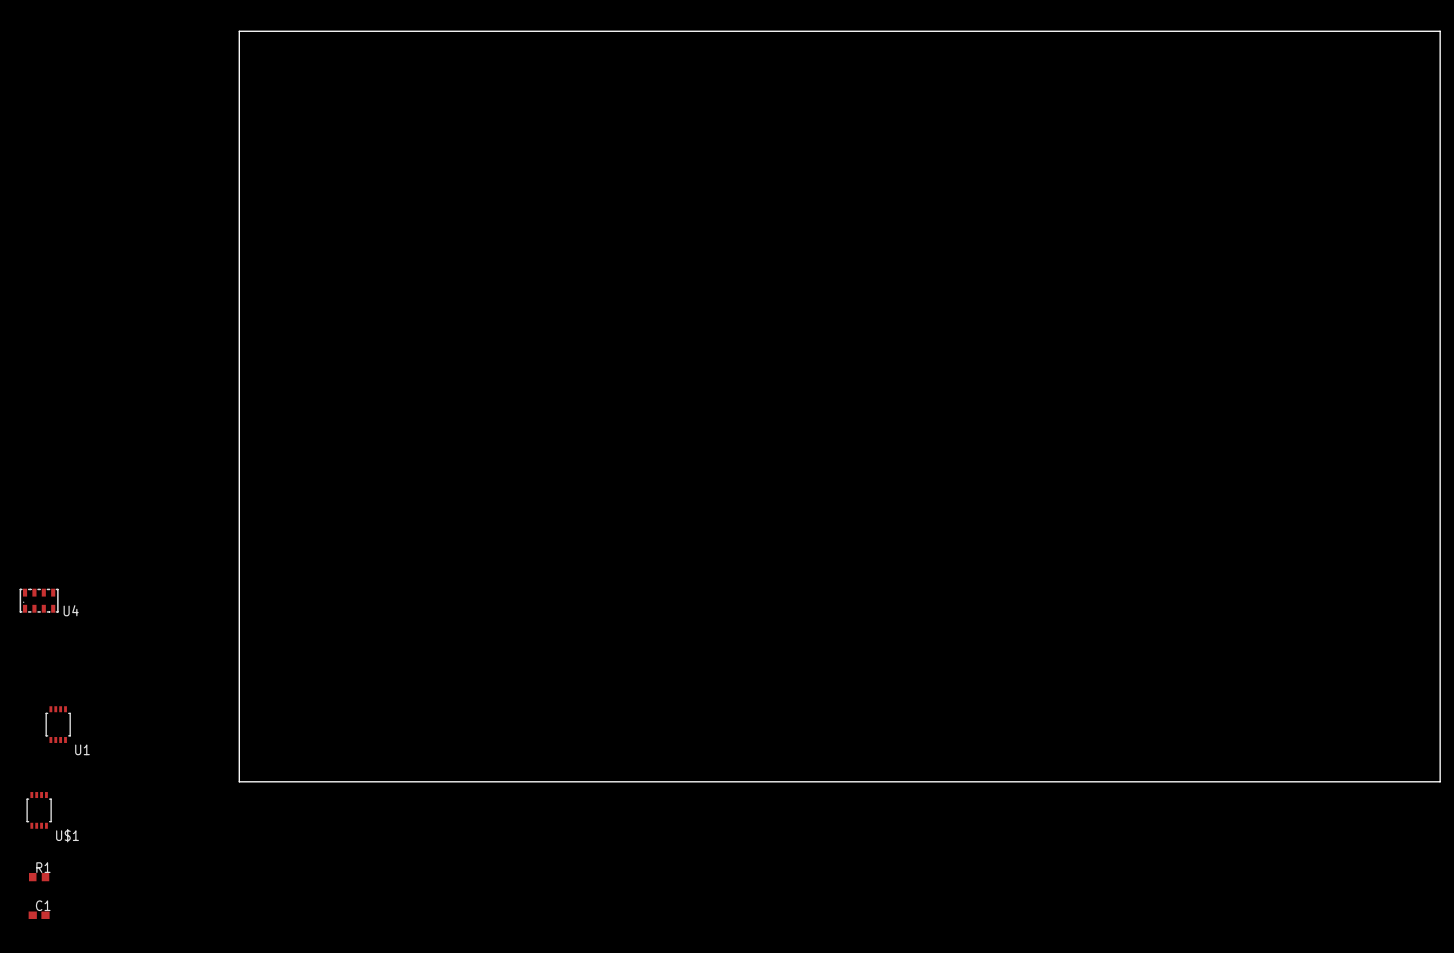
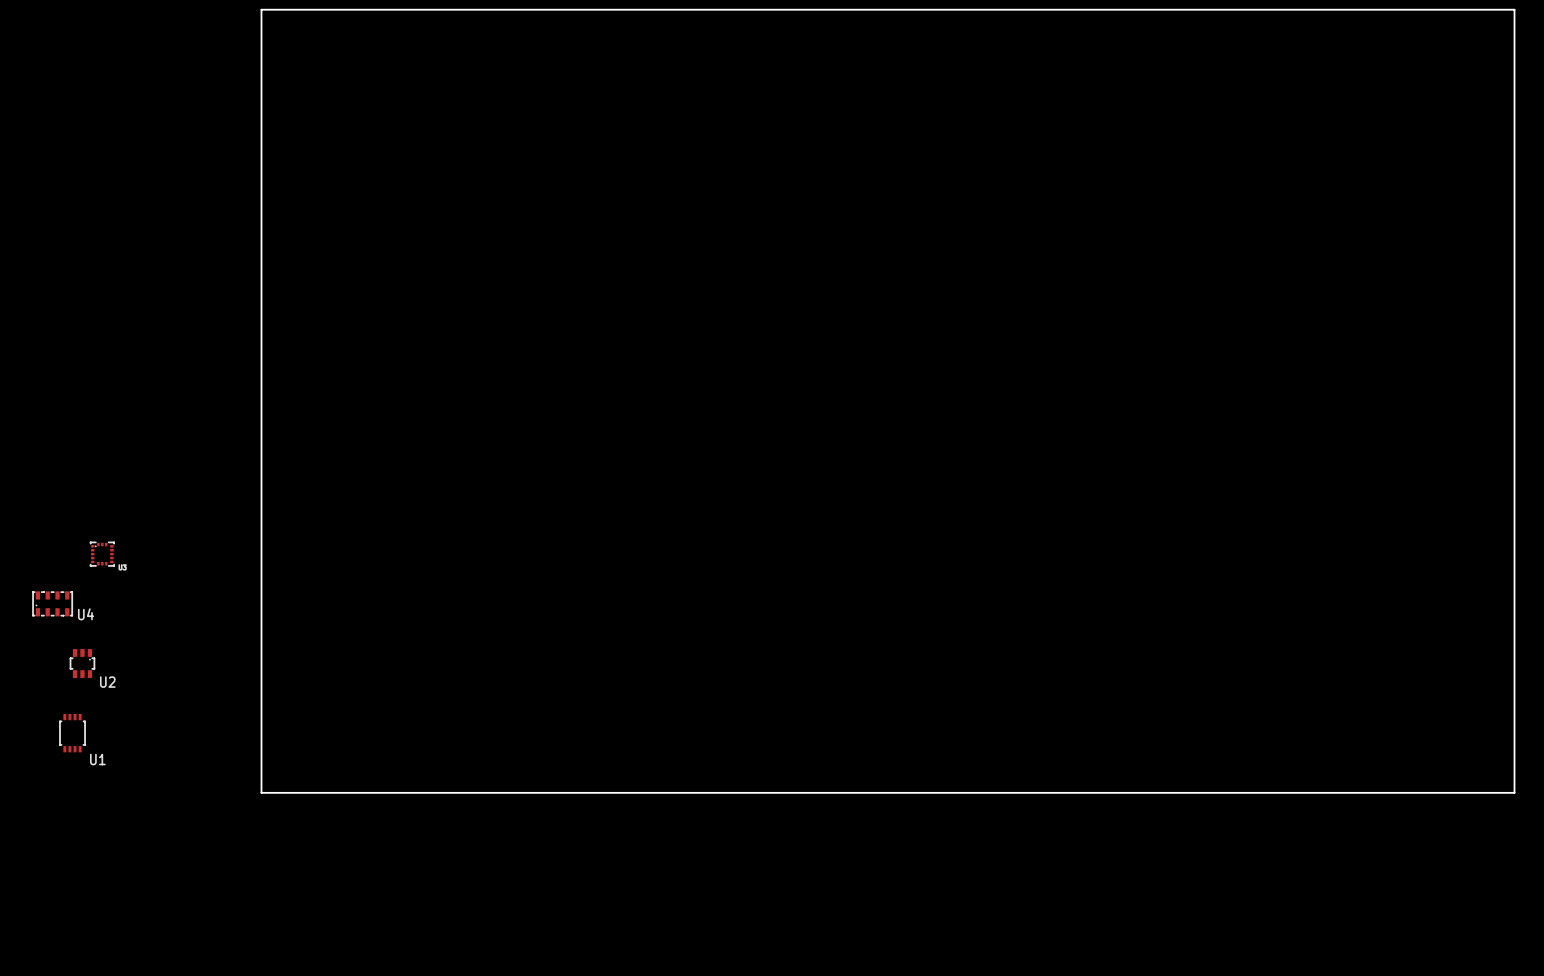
part: none -> (102, 554)
U2: none -> (82, 663)
U$1: (39, 810) -> none
R1: (39, 877) -> none
C1: (39, 915) -> none

